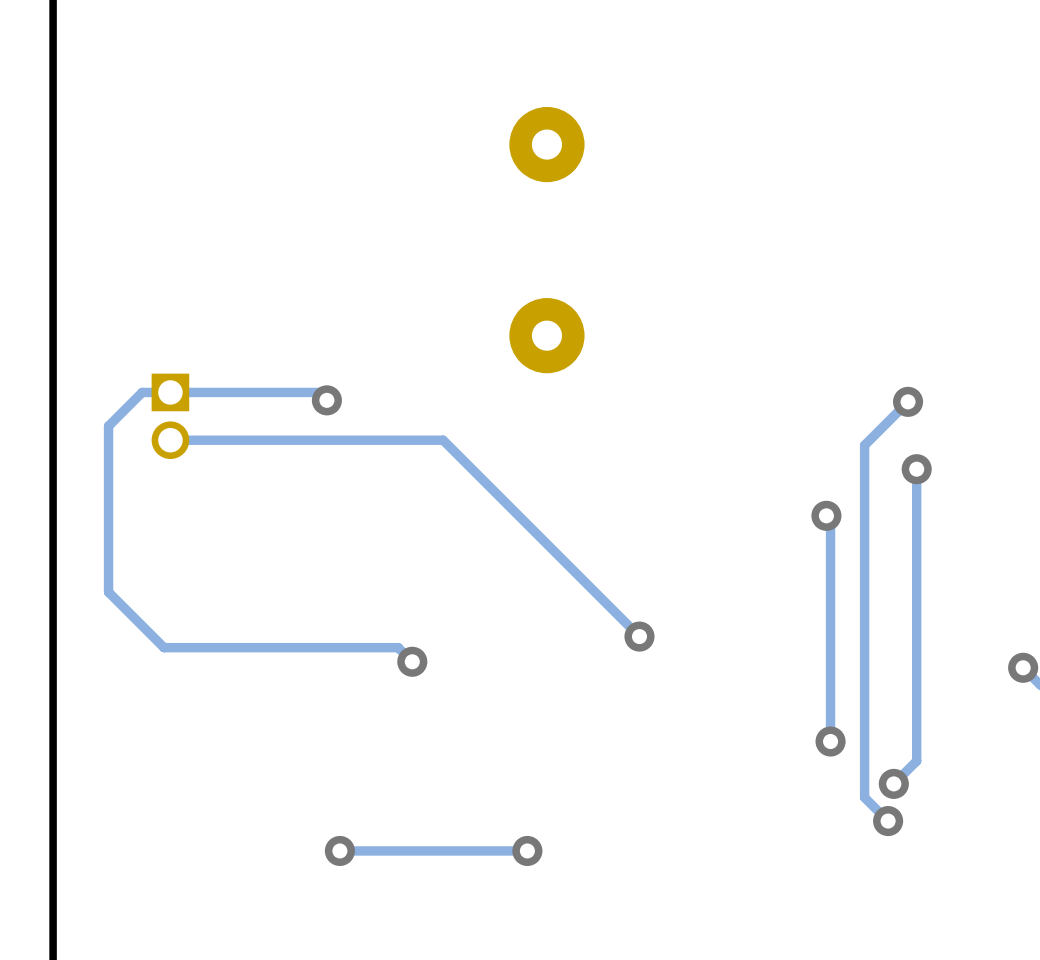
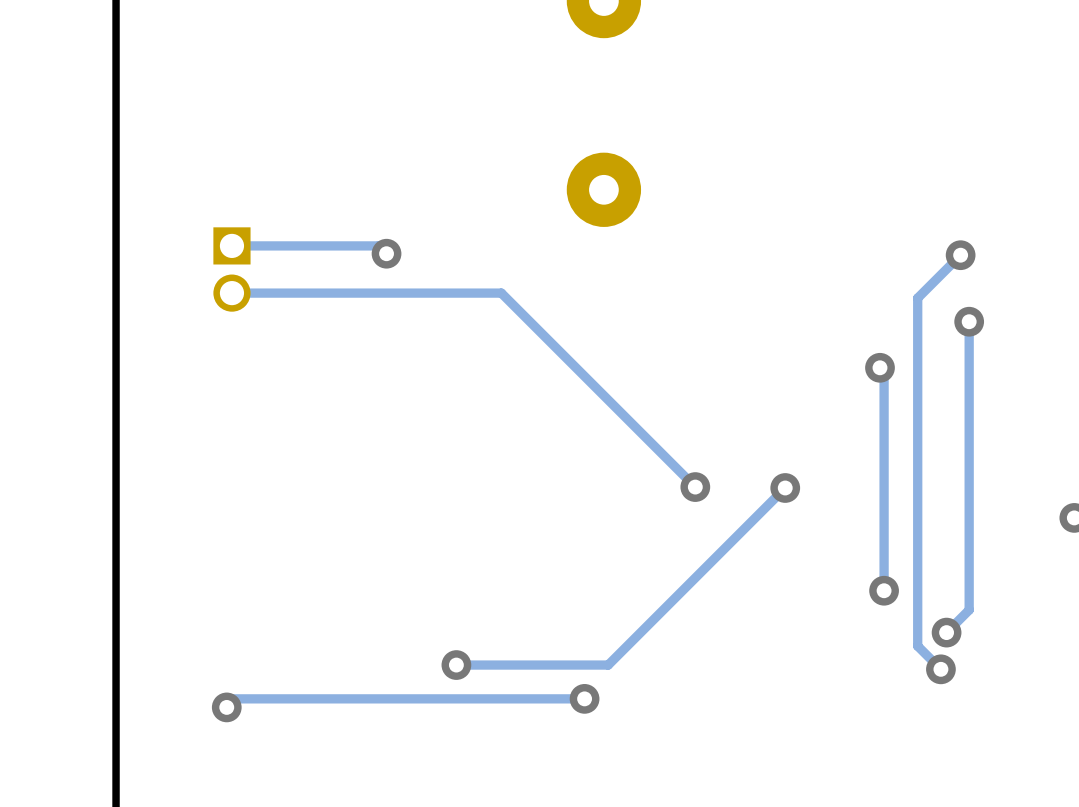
track: (170, 392) (142, 392) (108, 426) (108, 592) (164, 647) (398, 647) (412, 661) -> none
track: none -> (785, 487) (608, 665) (456, 665)
via: none -> (785, 487)
via: (412, 661) -> none
track: none -> (399, 698) (229, 698) (226, 701) (226, 707)
via position: (339, 850) -> (456, 665)
via: none -> (226, 707)

